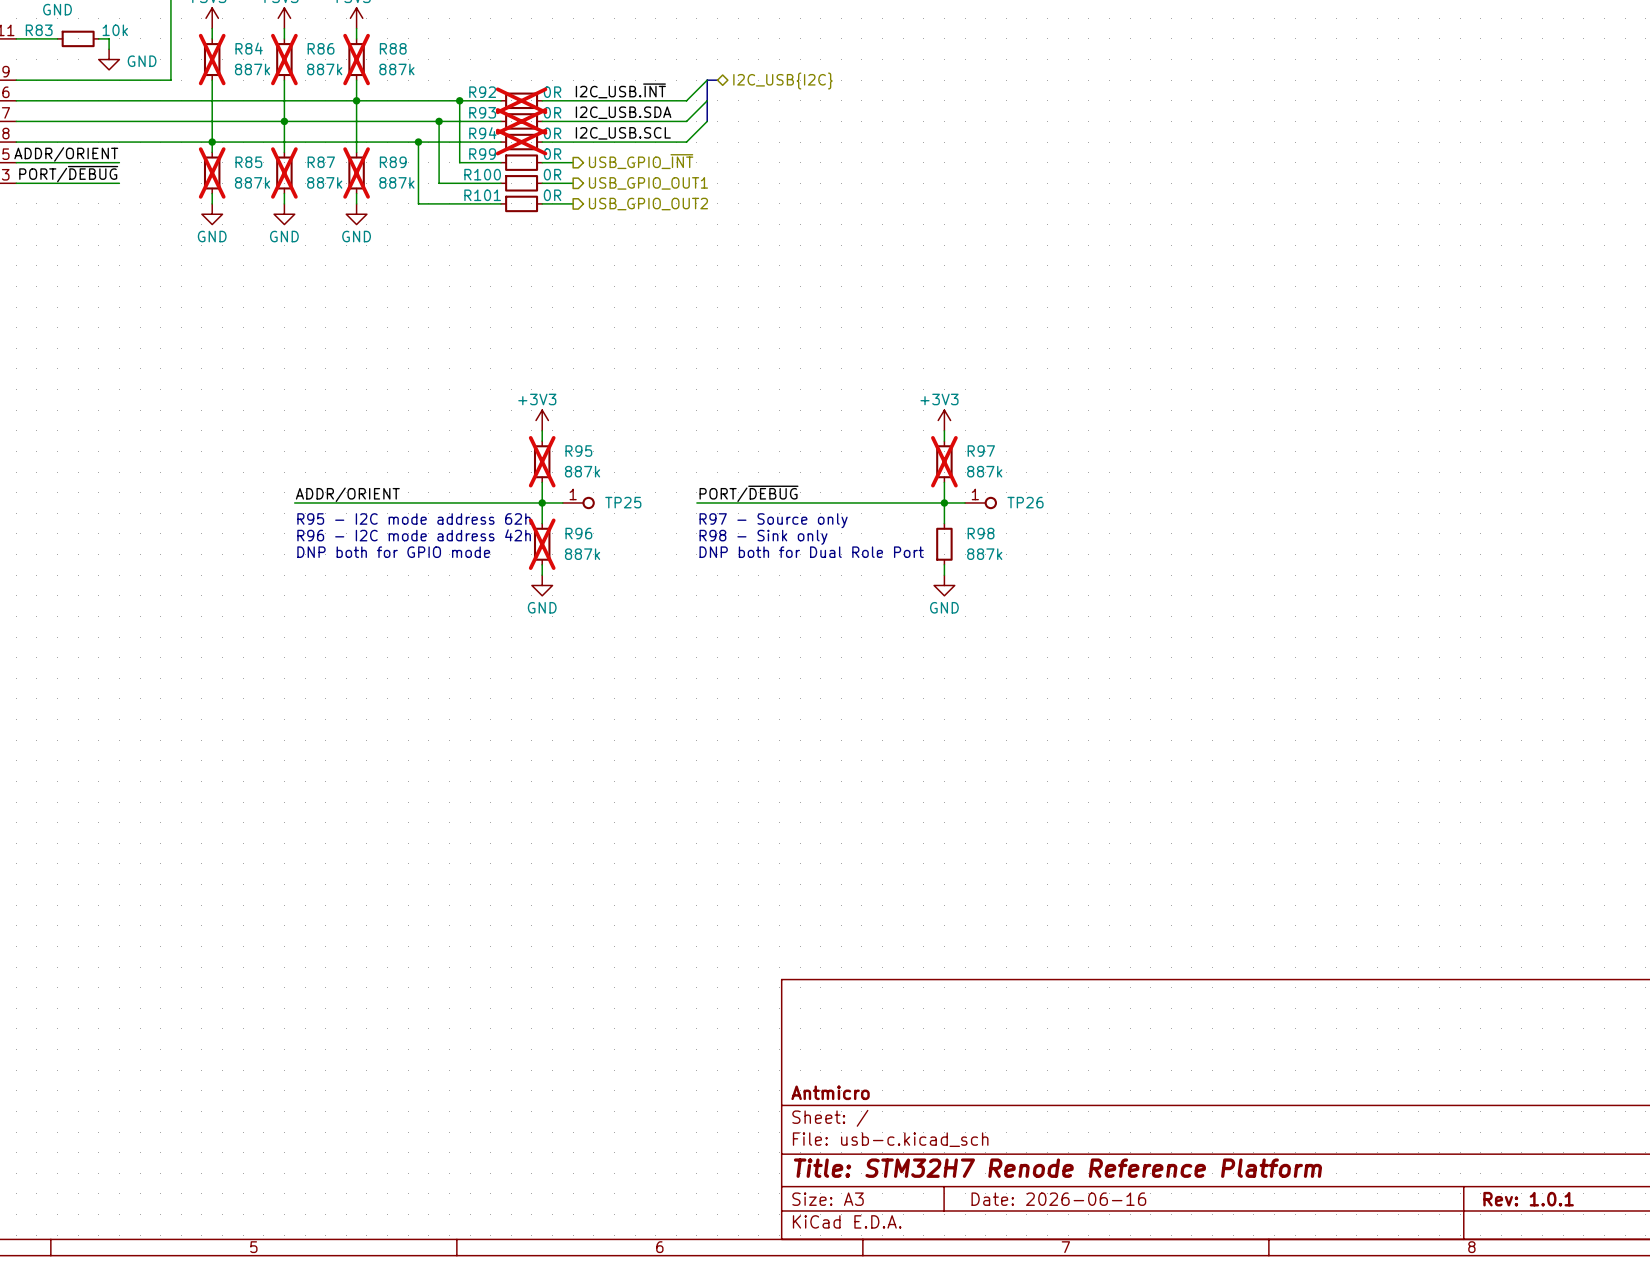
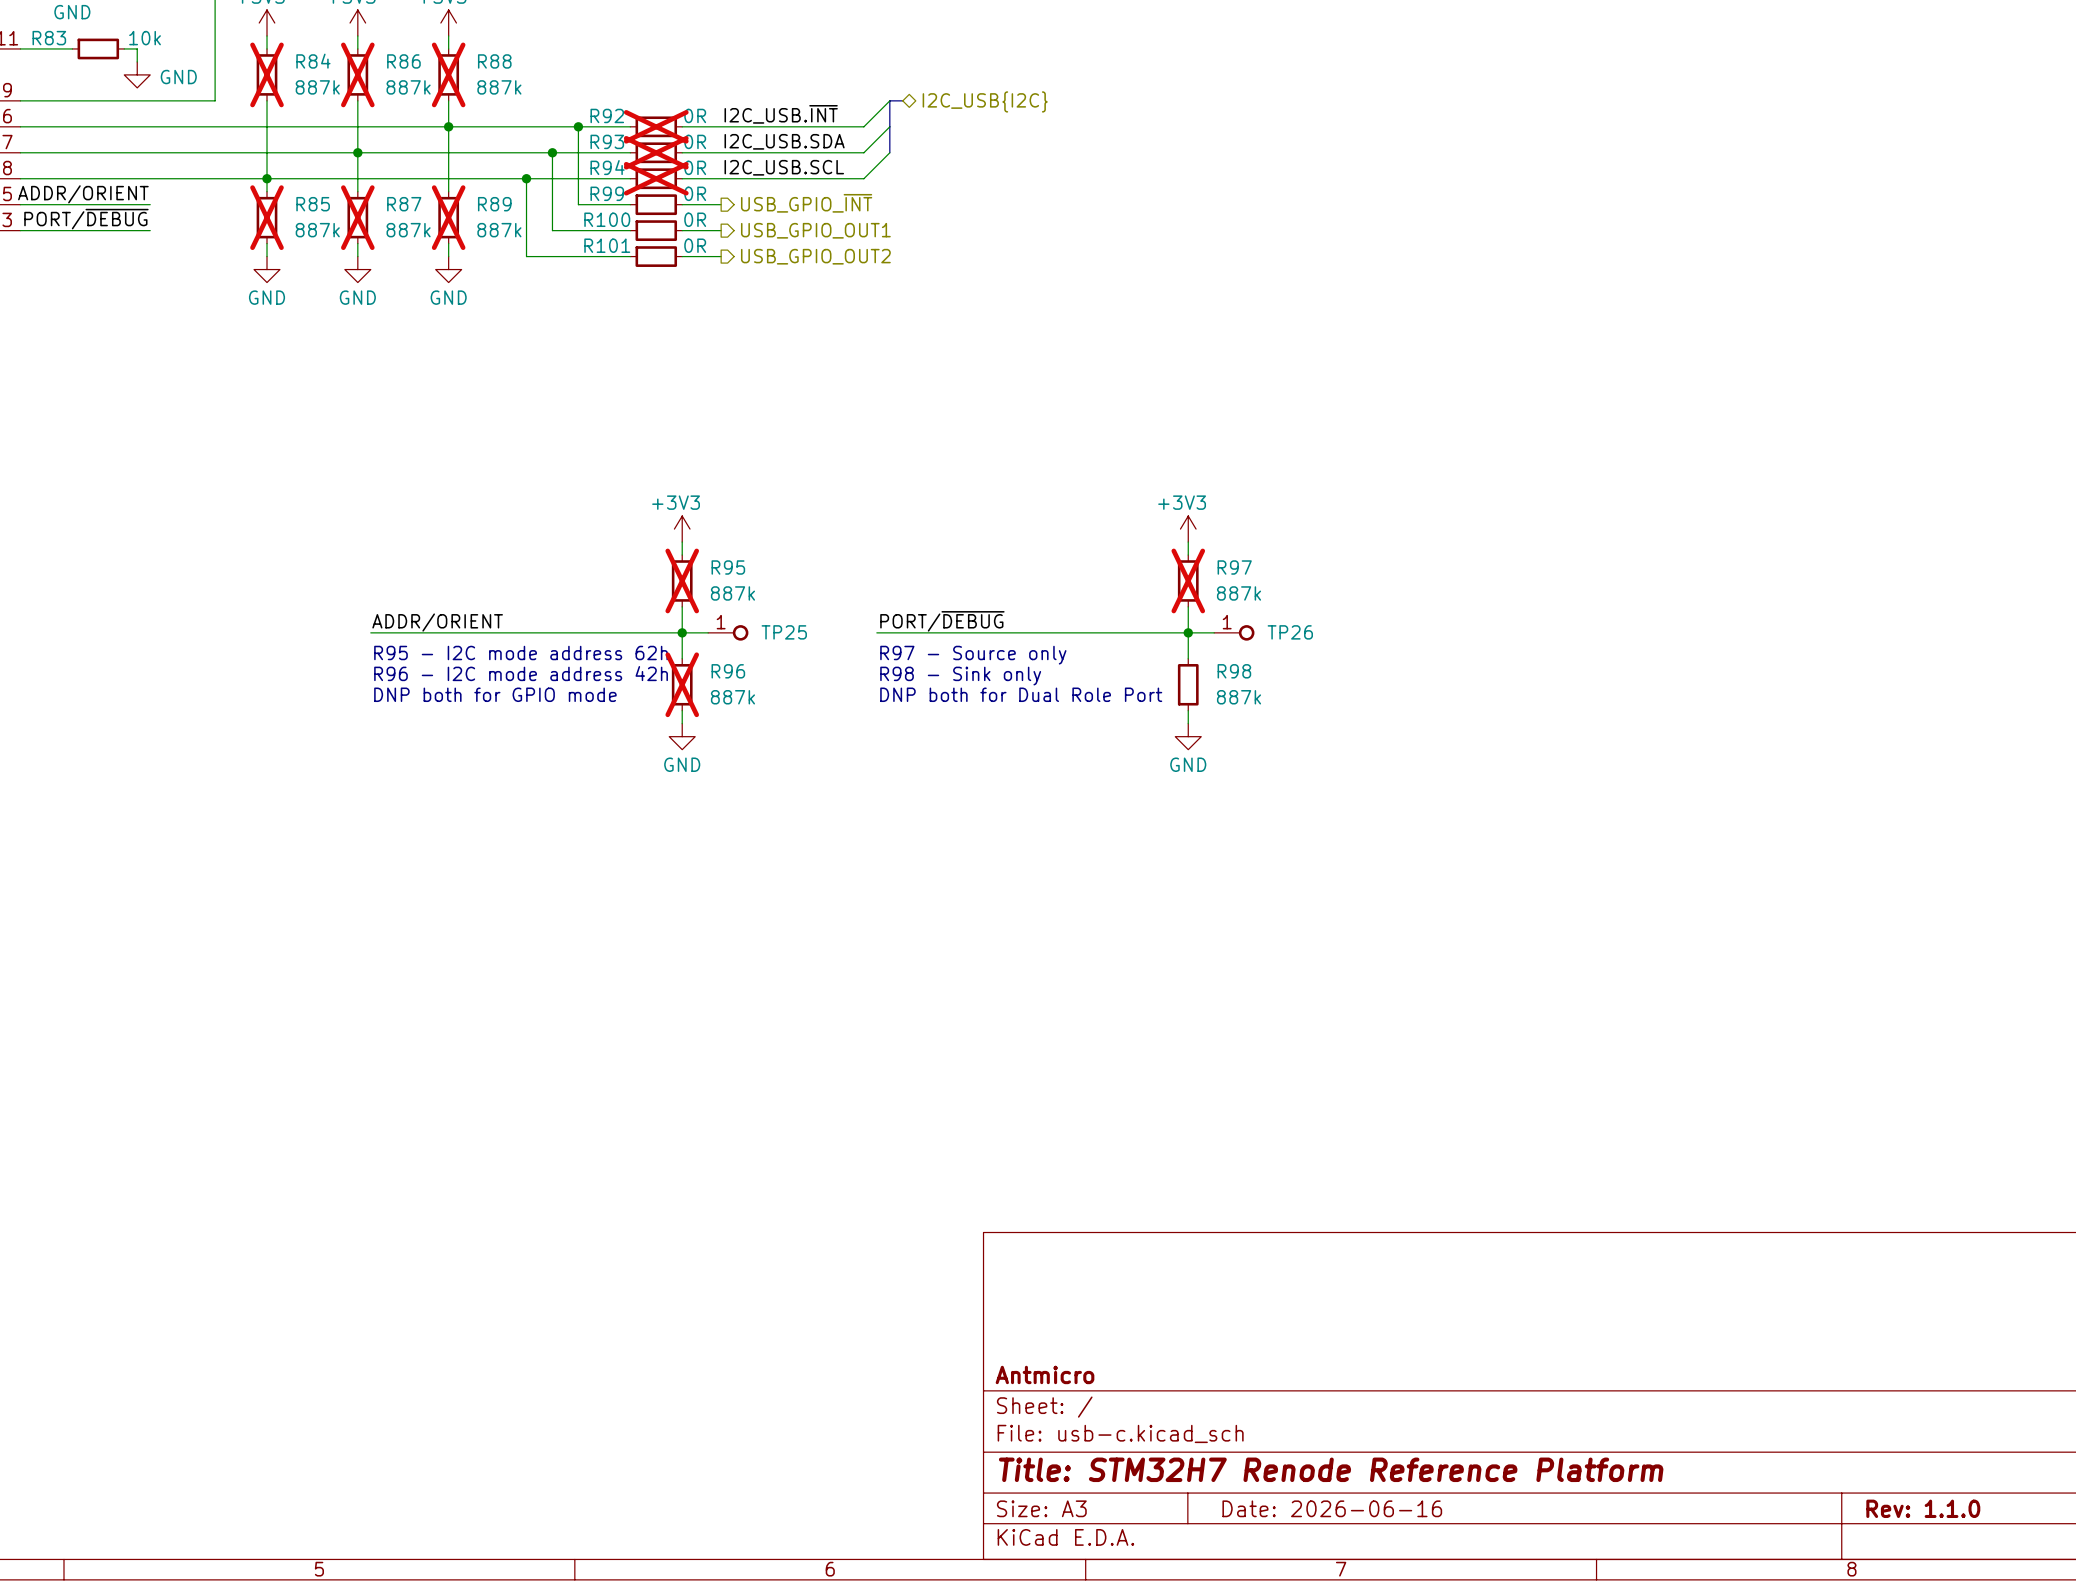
title block: Rev: 1.0.1 (1528, 1199) -> Rev: 1.1.0 (1923, 1508)

